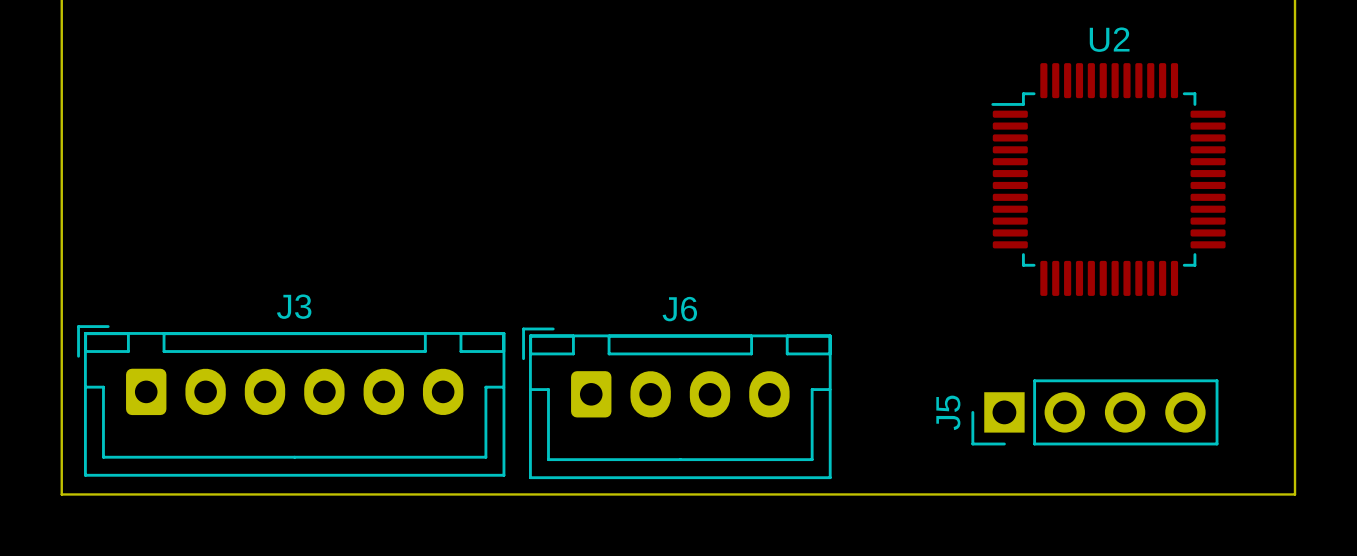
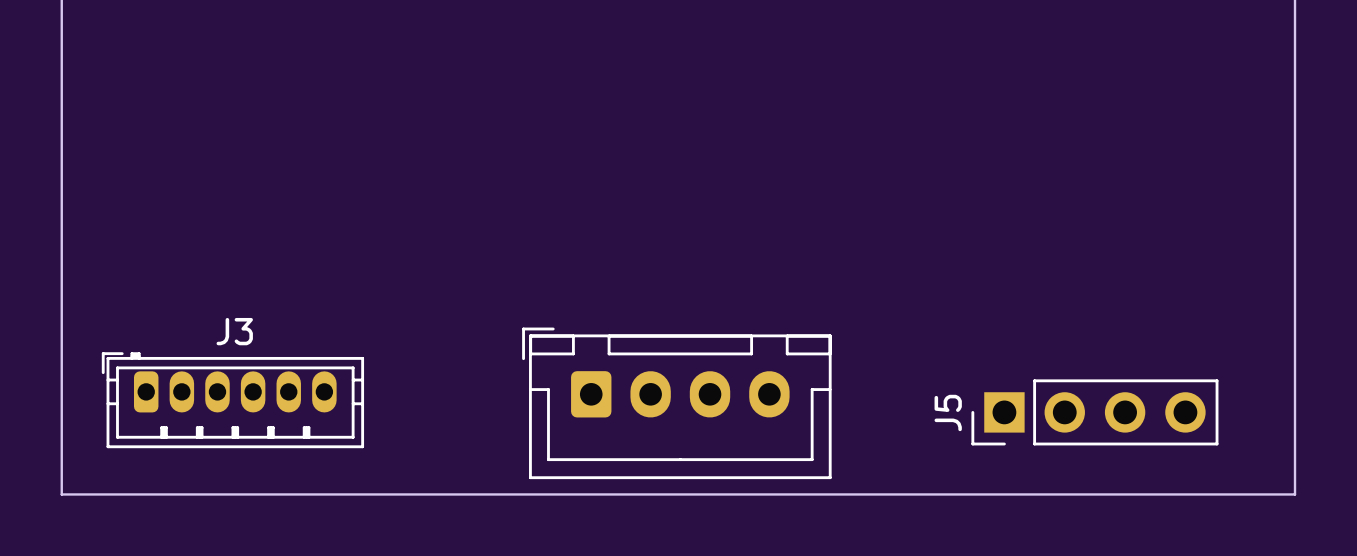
U2: (1108, 179) -> none
J6 name: J6 (679, 309) -> none
J3 footprint: [77, 325, 506, 477] -> [101, 352, 365, 449]

